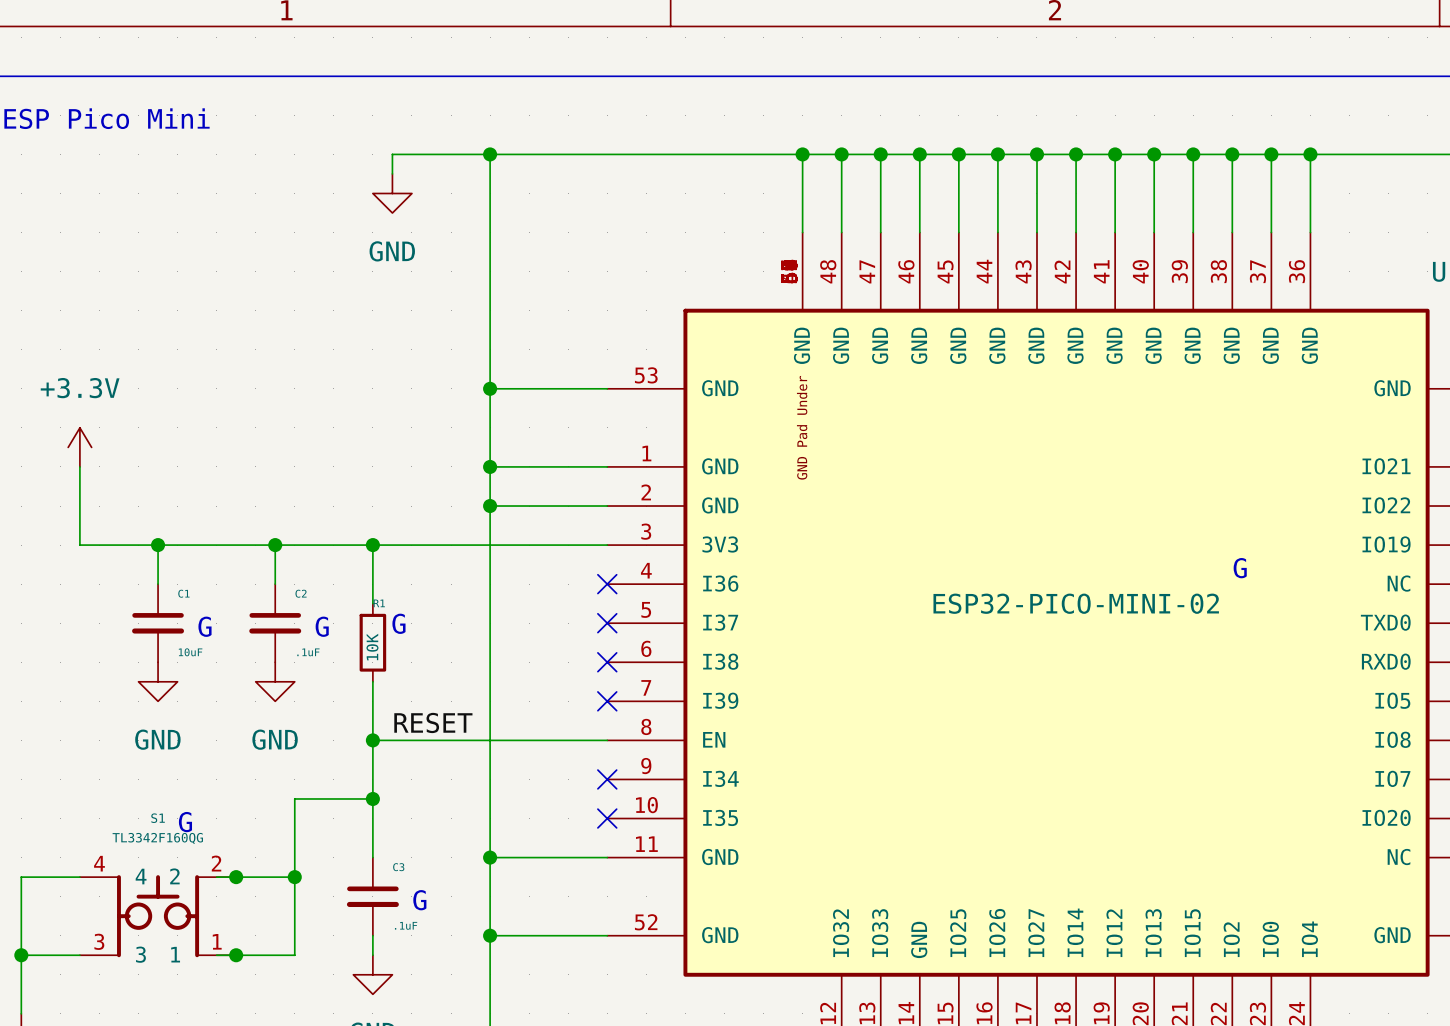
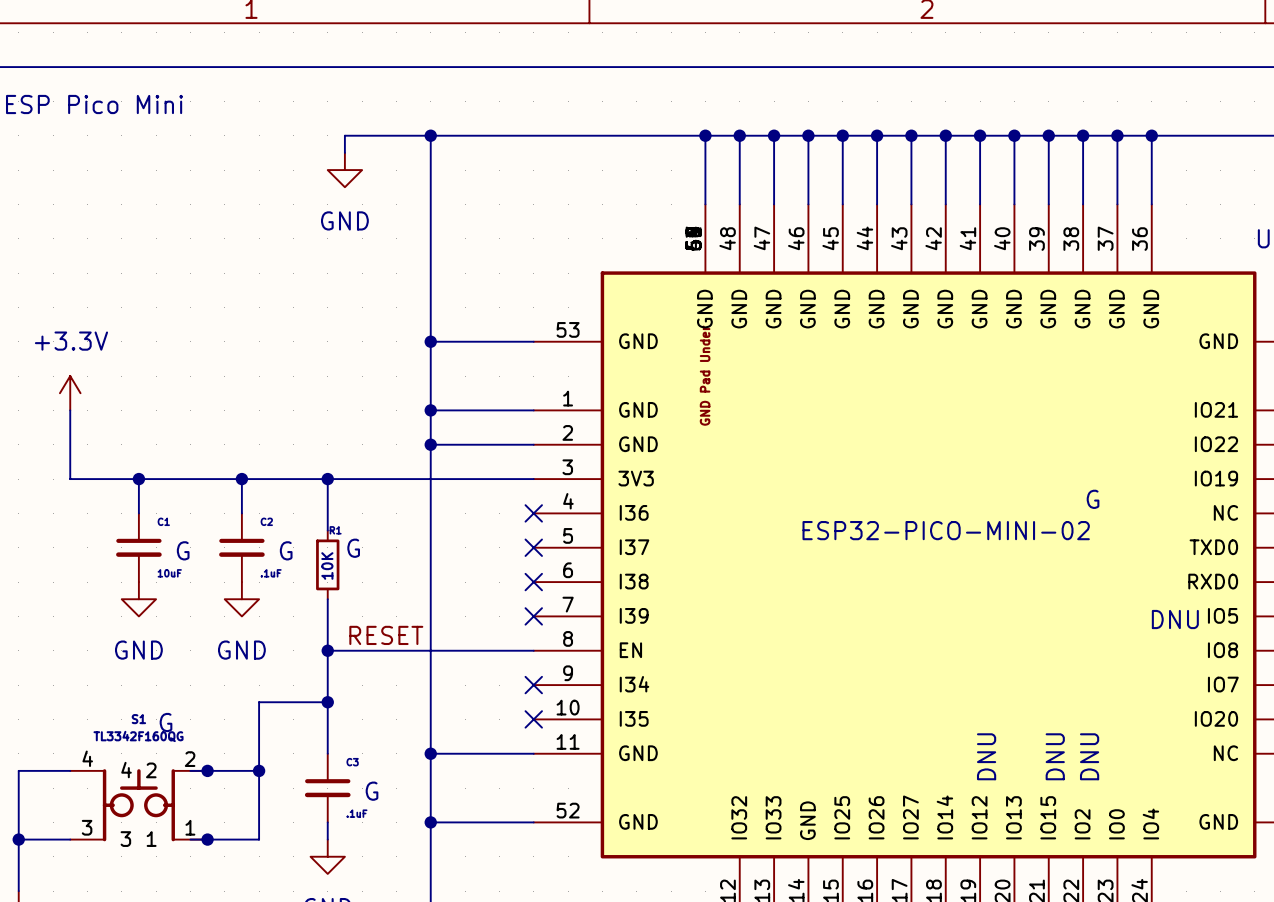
text: none -> DNU (1175, 619)
text: none -> DNU (986, 756)
text: none -> DNU (1055, 756)
text: none -> DNU (1089, 756)

